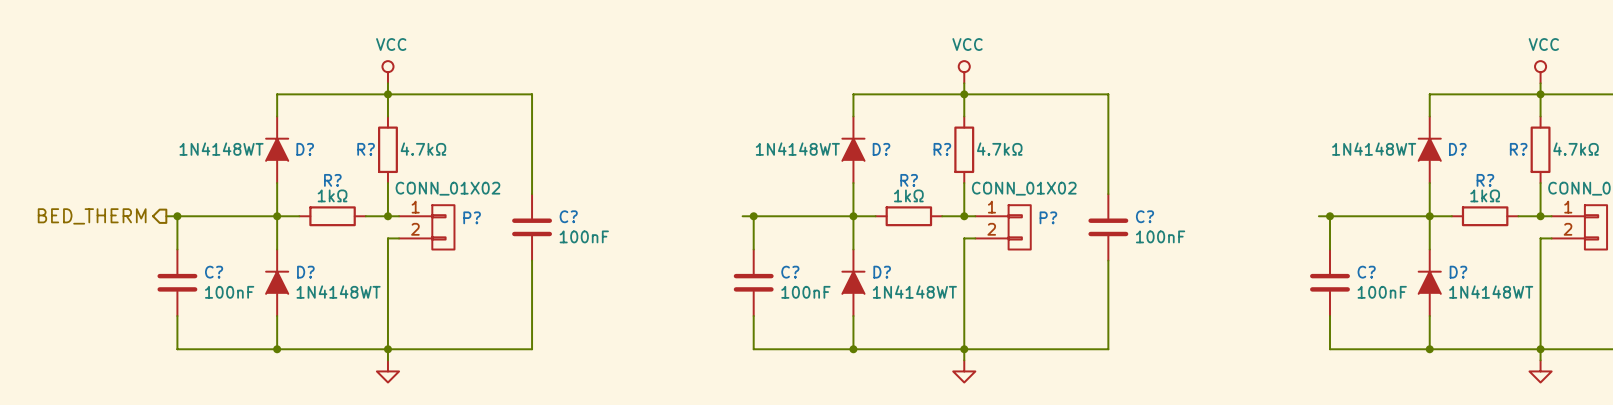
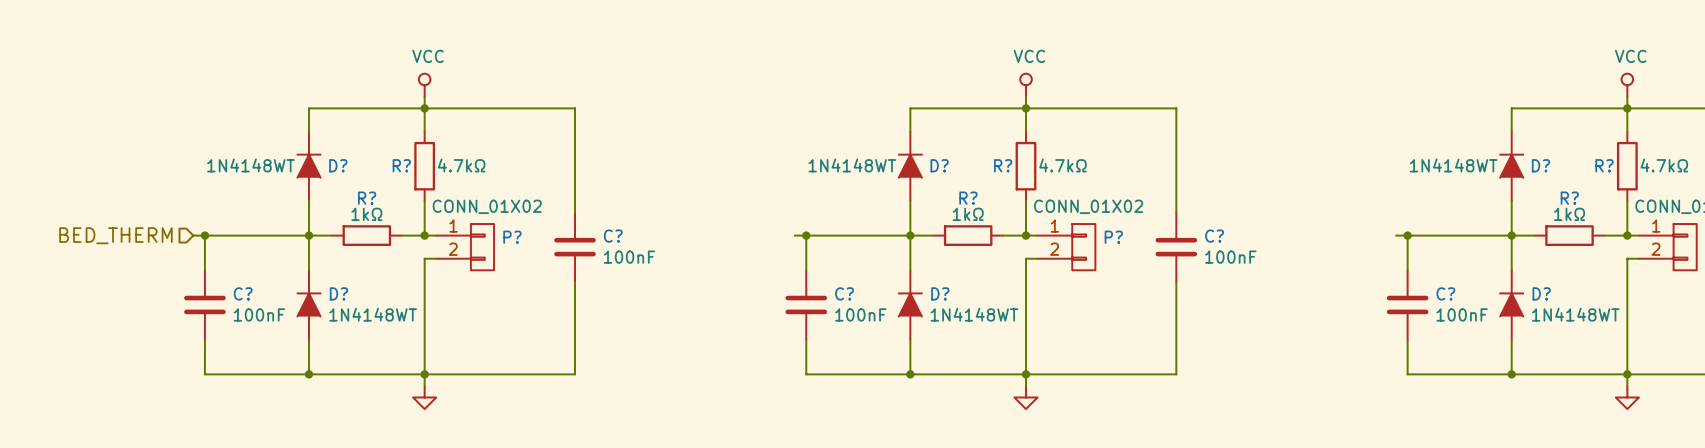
hierarchical label shape: output (92, 216) -> input (115, 235)

